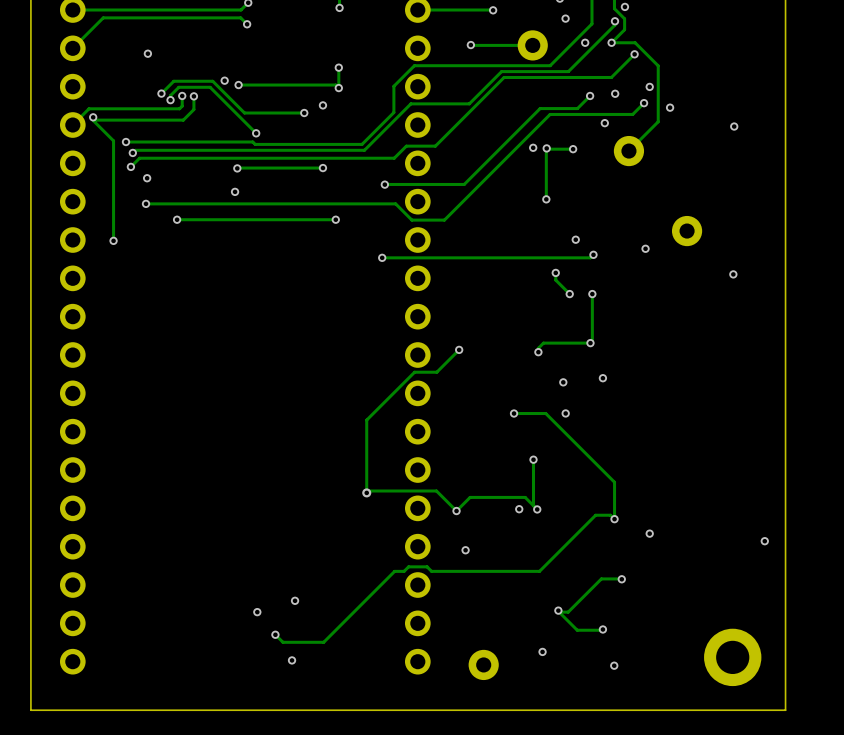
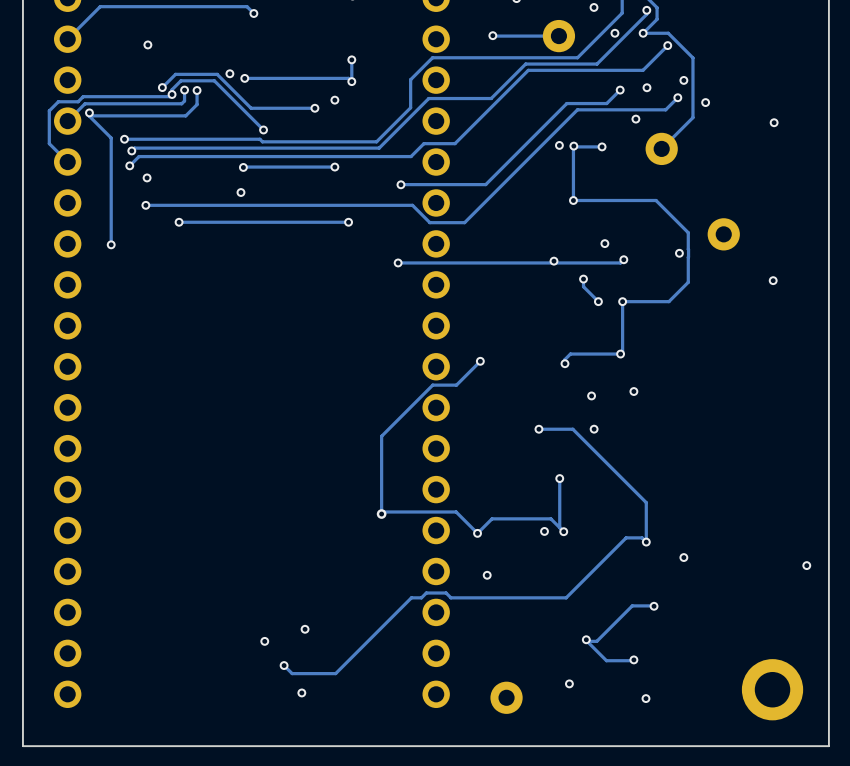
track: none -> (172, 94) (169, 96) (83, 96) (78, 101) (58, 101) (49, 110) (49, 143) (67, 162)
track: none -> (573, 200) (656, 200) (688, 232) (688, 282) (668, 301) (622, 301)
via: none -> (553, 261)

